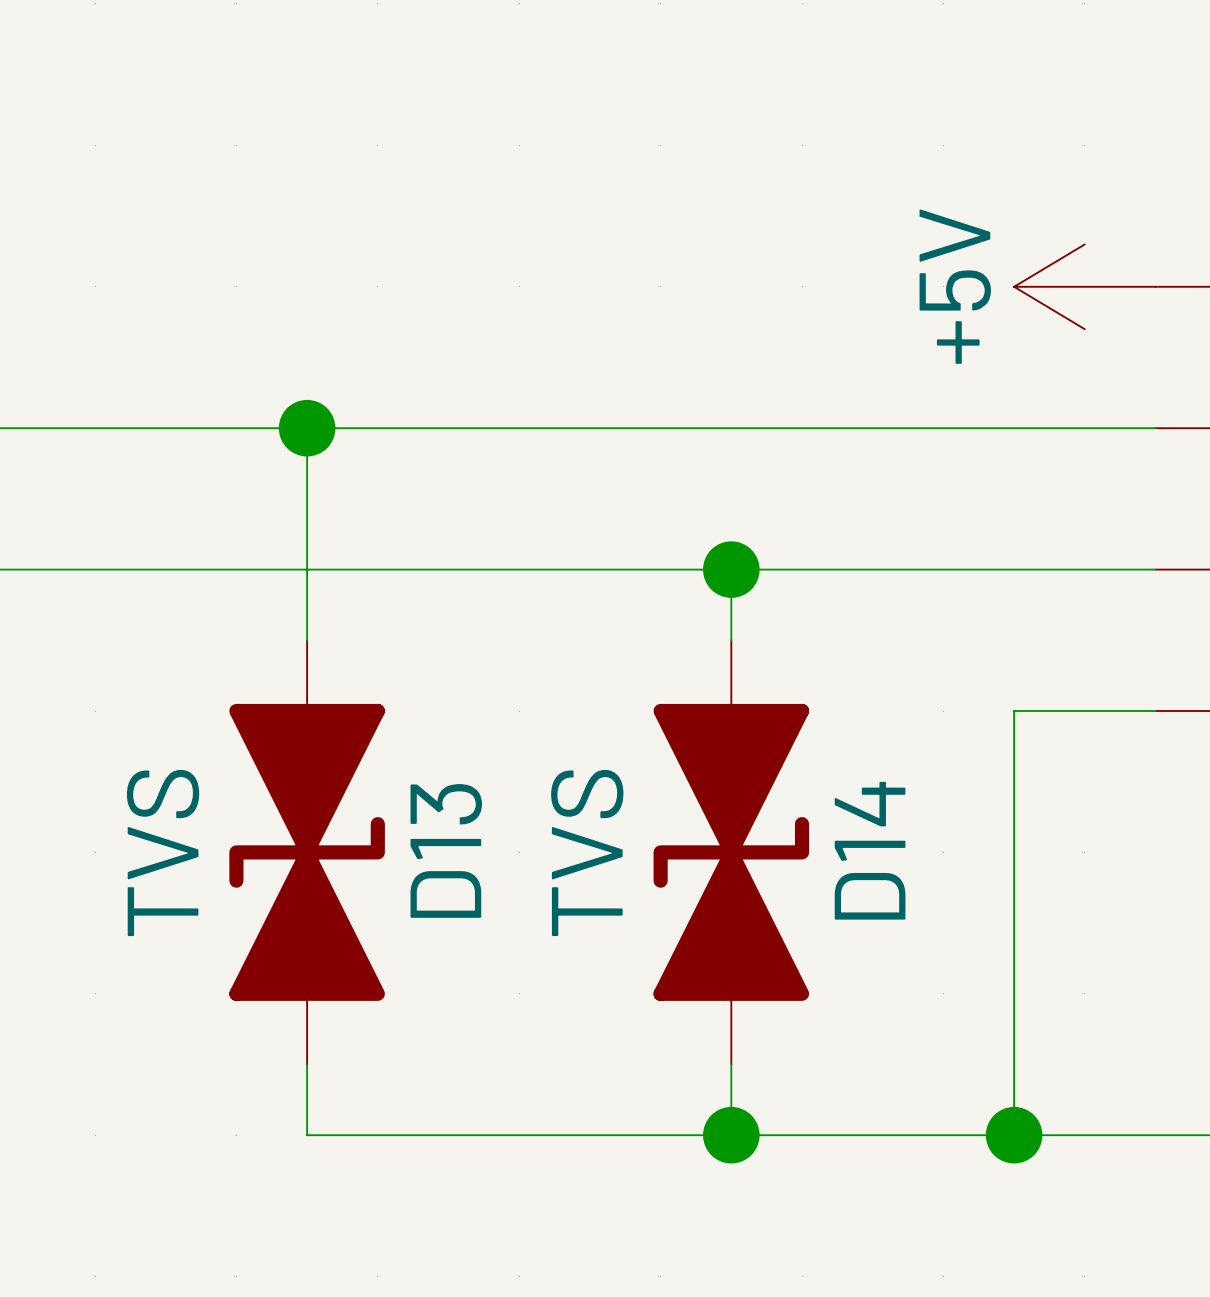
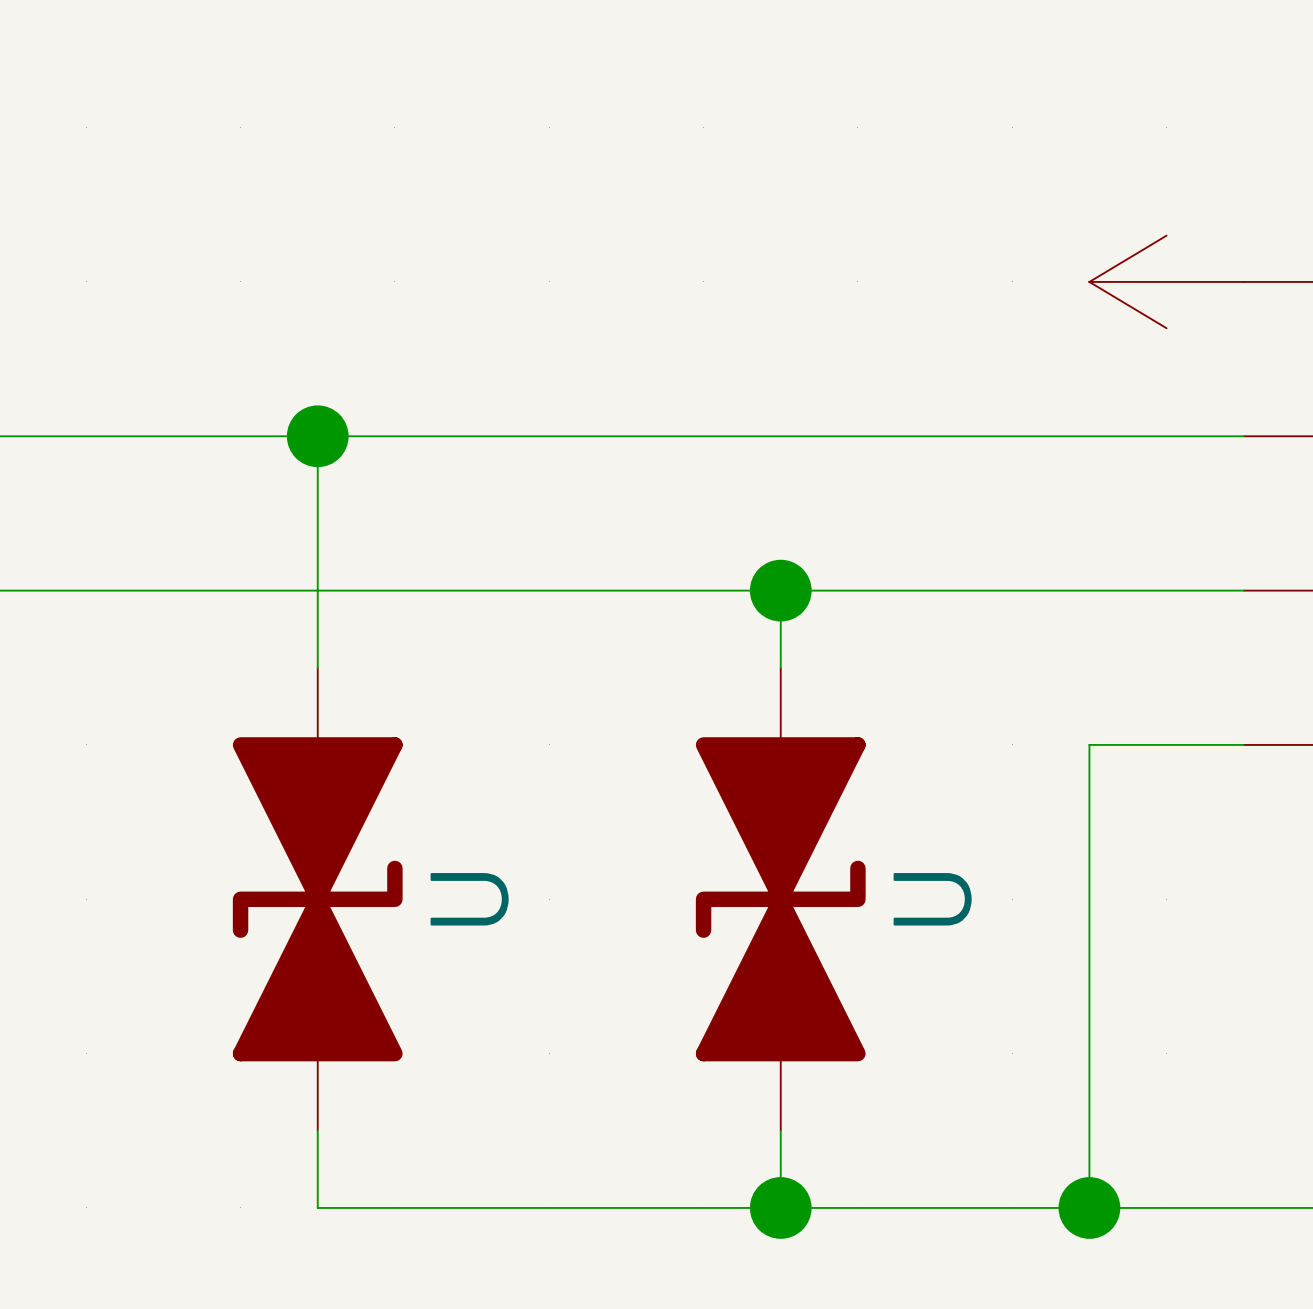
power symbol text: +5V (955, 286) -> none
D13 name: D13 (446, 850) -> U (469, 899)
D14 name: D14 (870, 850) -> U (932, 899)
D13 value: TVS (163, 852) -> none
D14 value: TVS (587, 852) -> none

